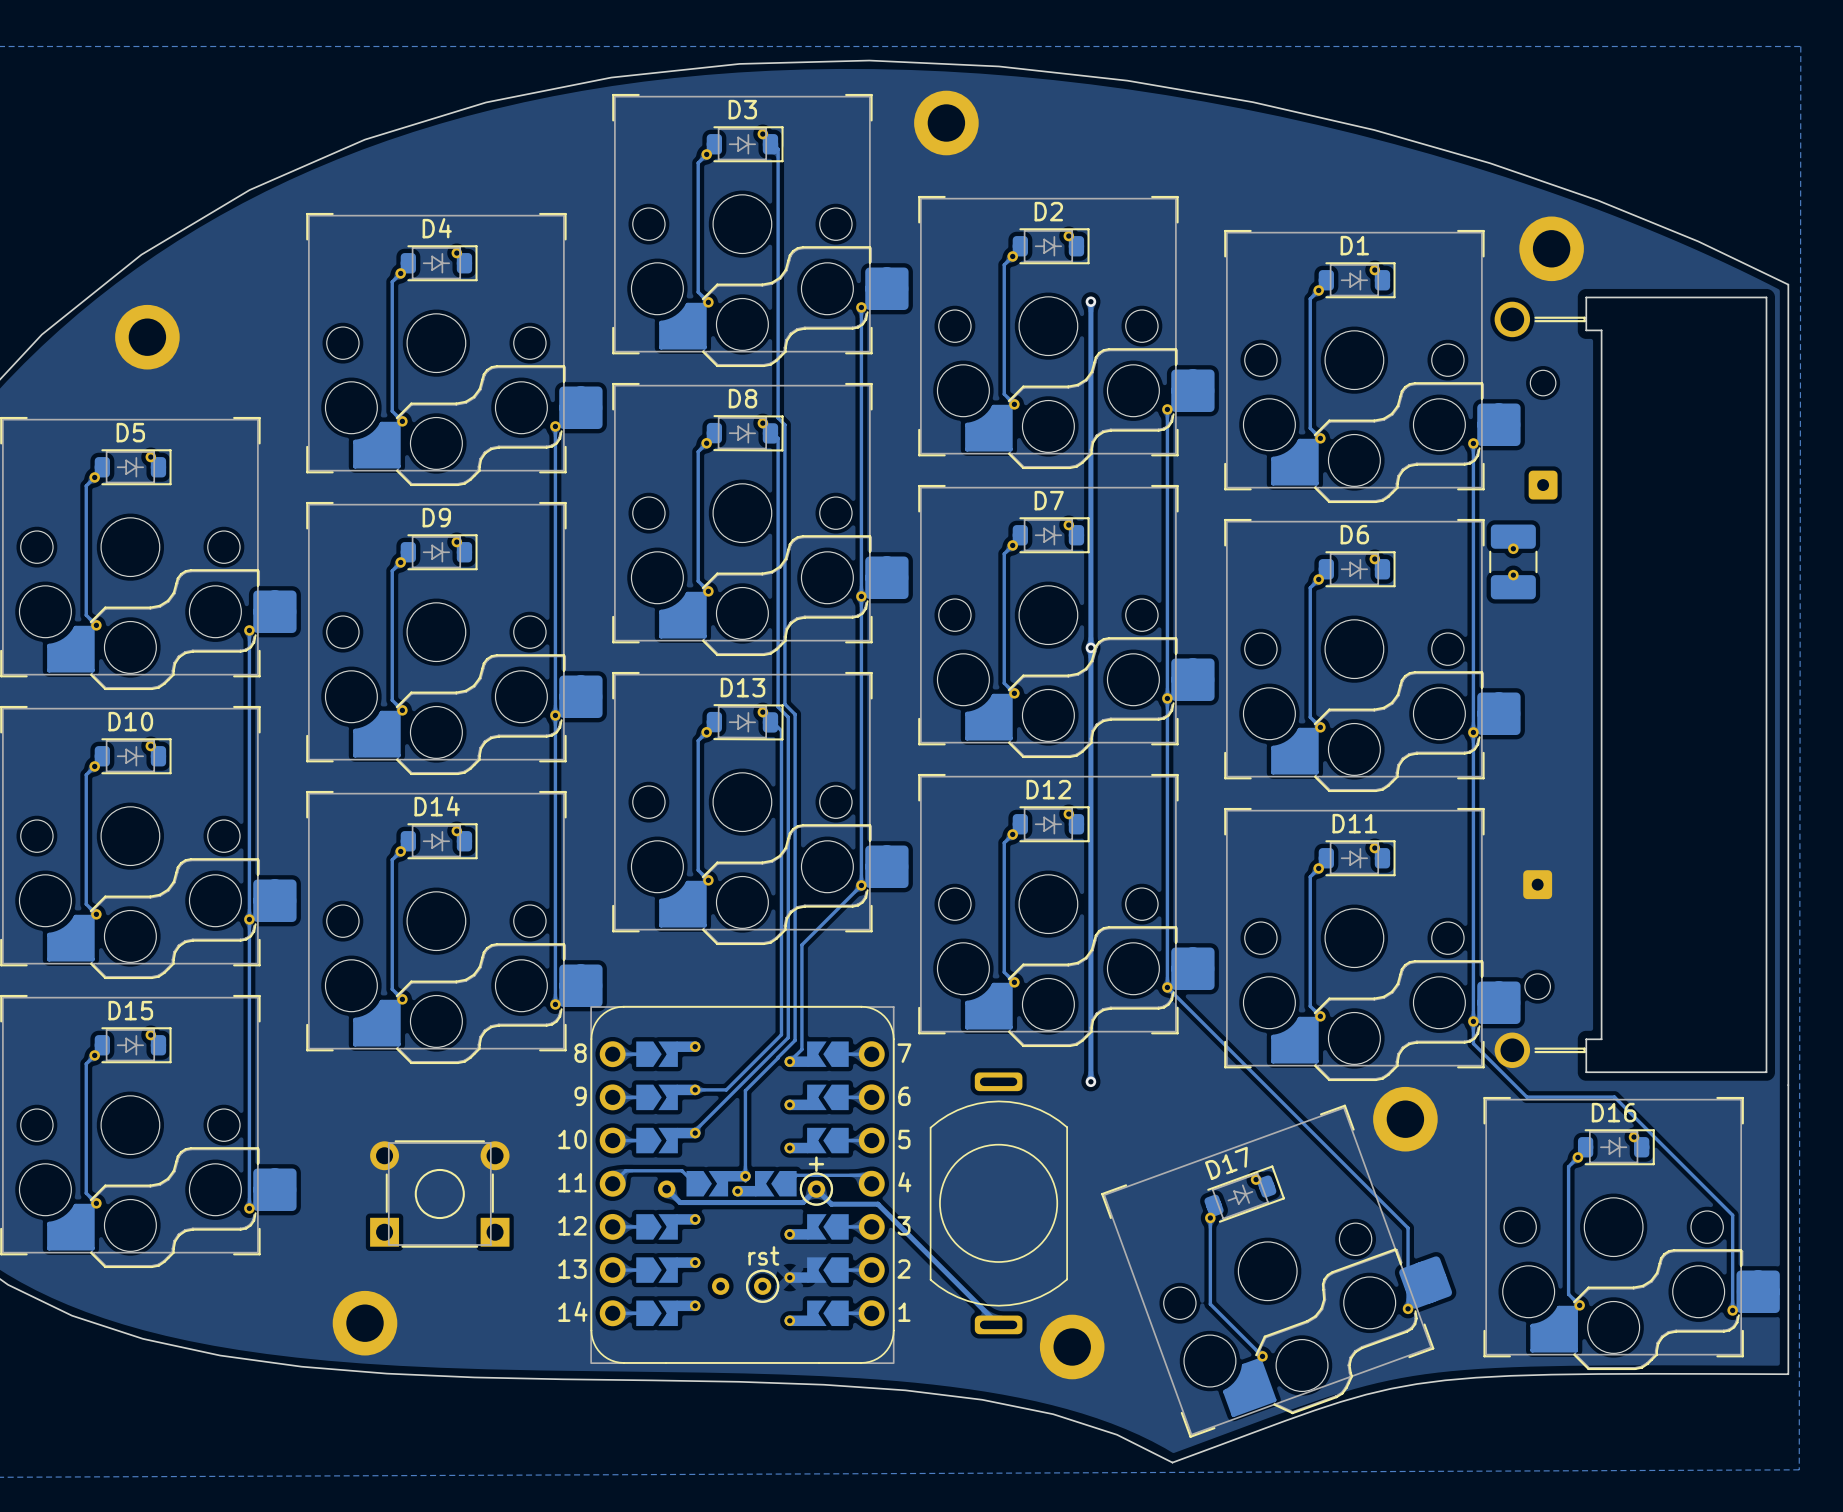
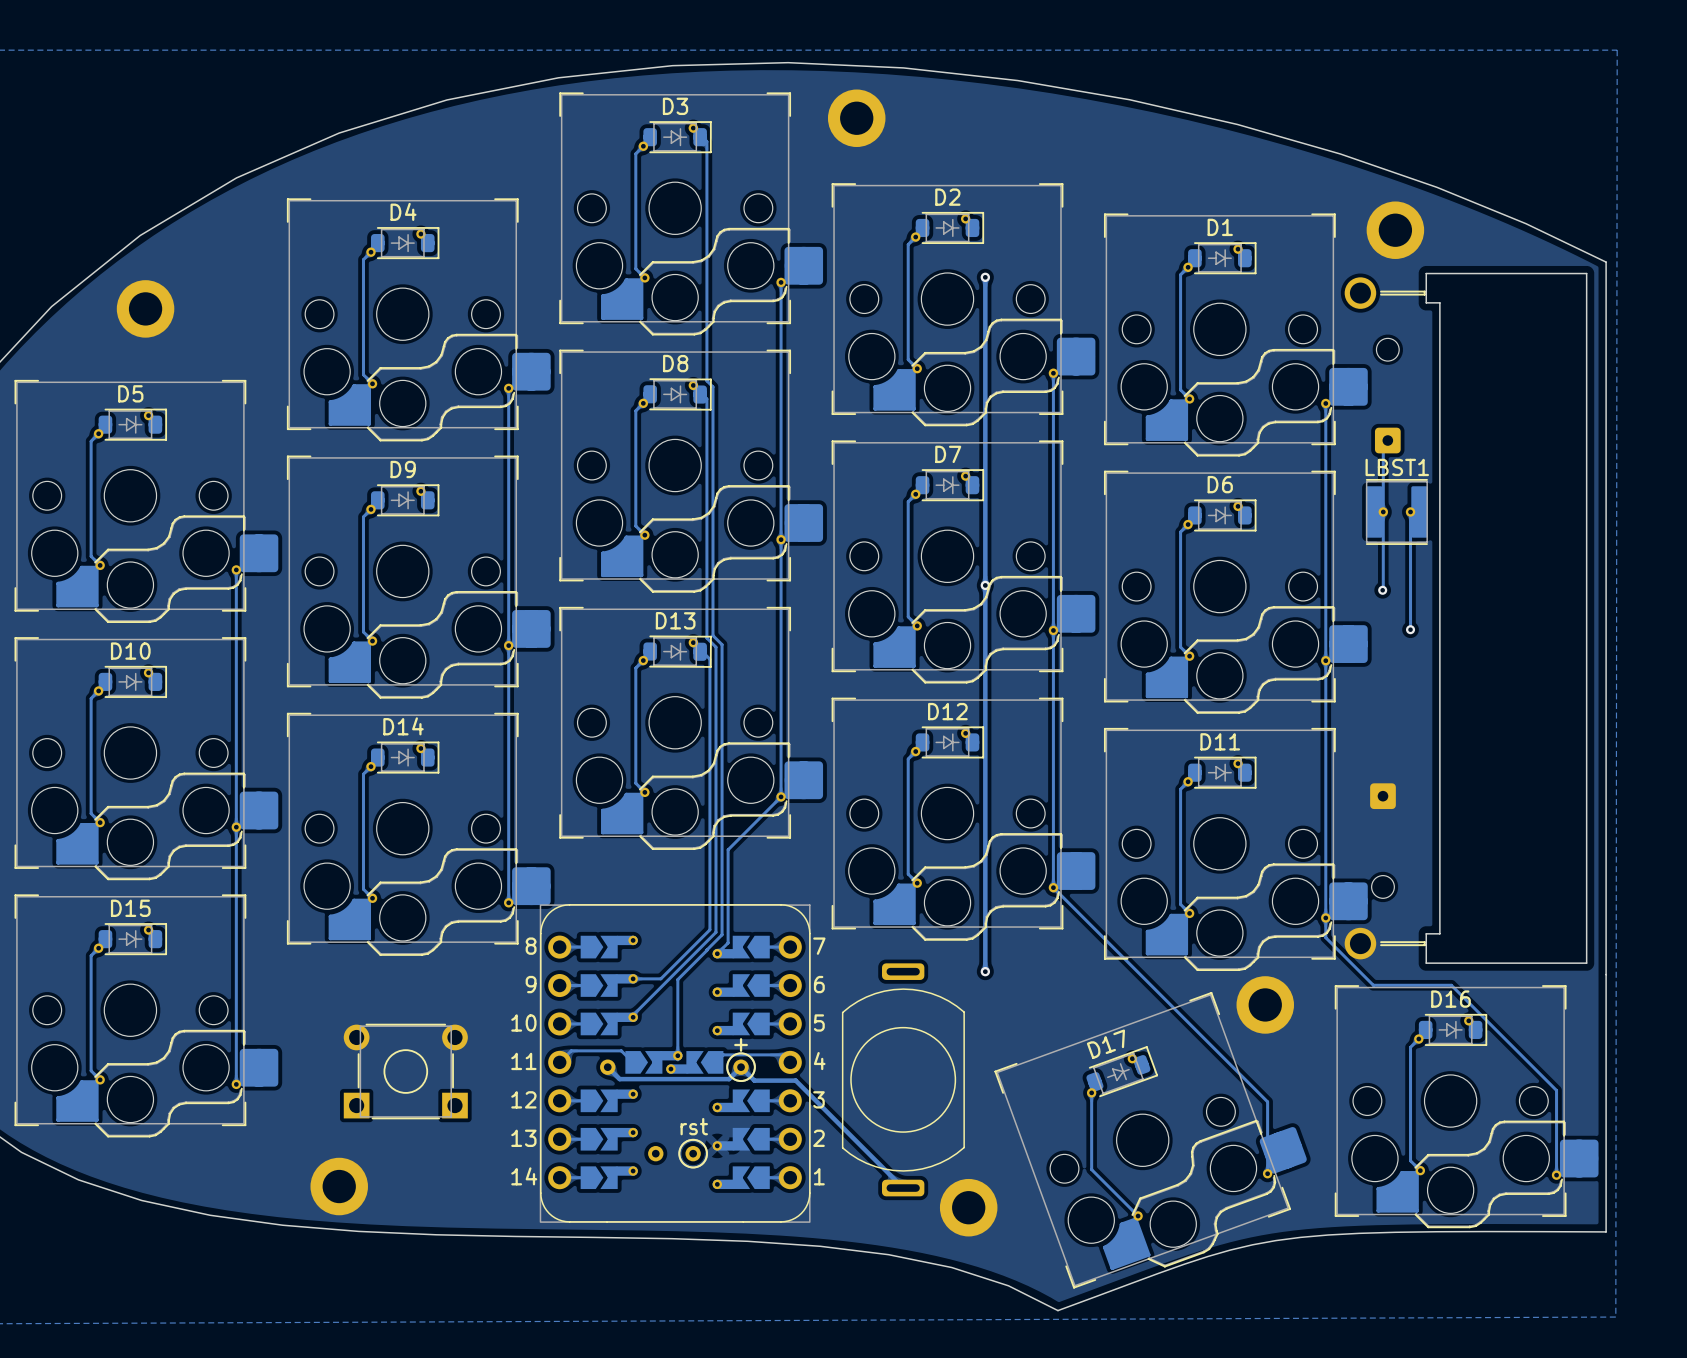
track: none -> (1387, 440) (1383, 445) (1382, 590)
part: (1513, 561) -> none
LBST1: none -> (1396, 511)
track: none -> (1410, 511) (1410, 629)
via: none -> (1382, 590)
via: none -> (1410, 629)

